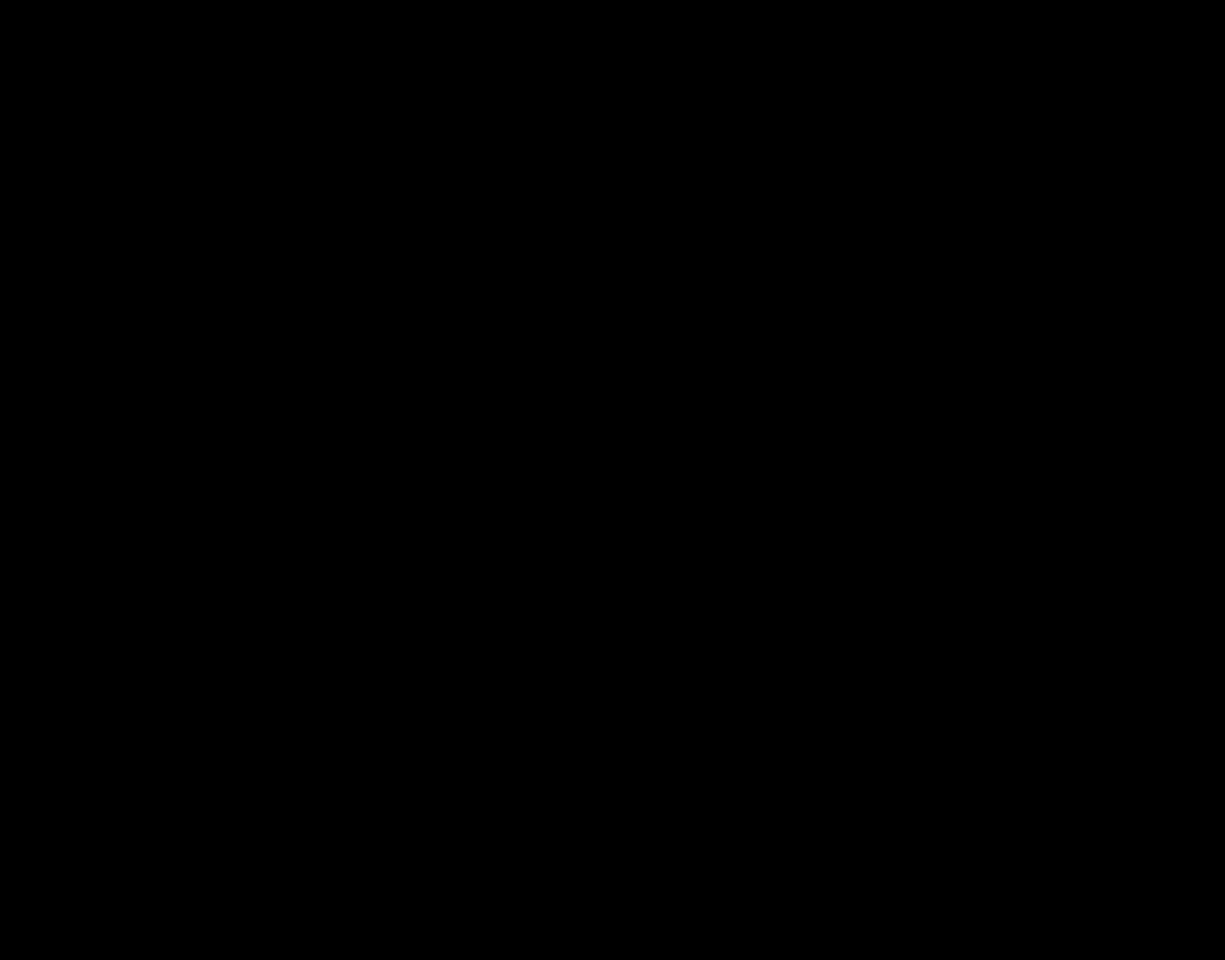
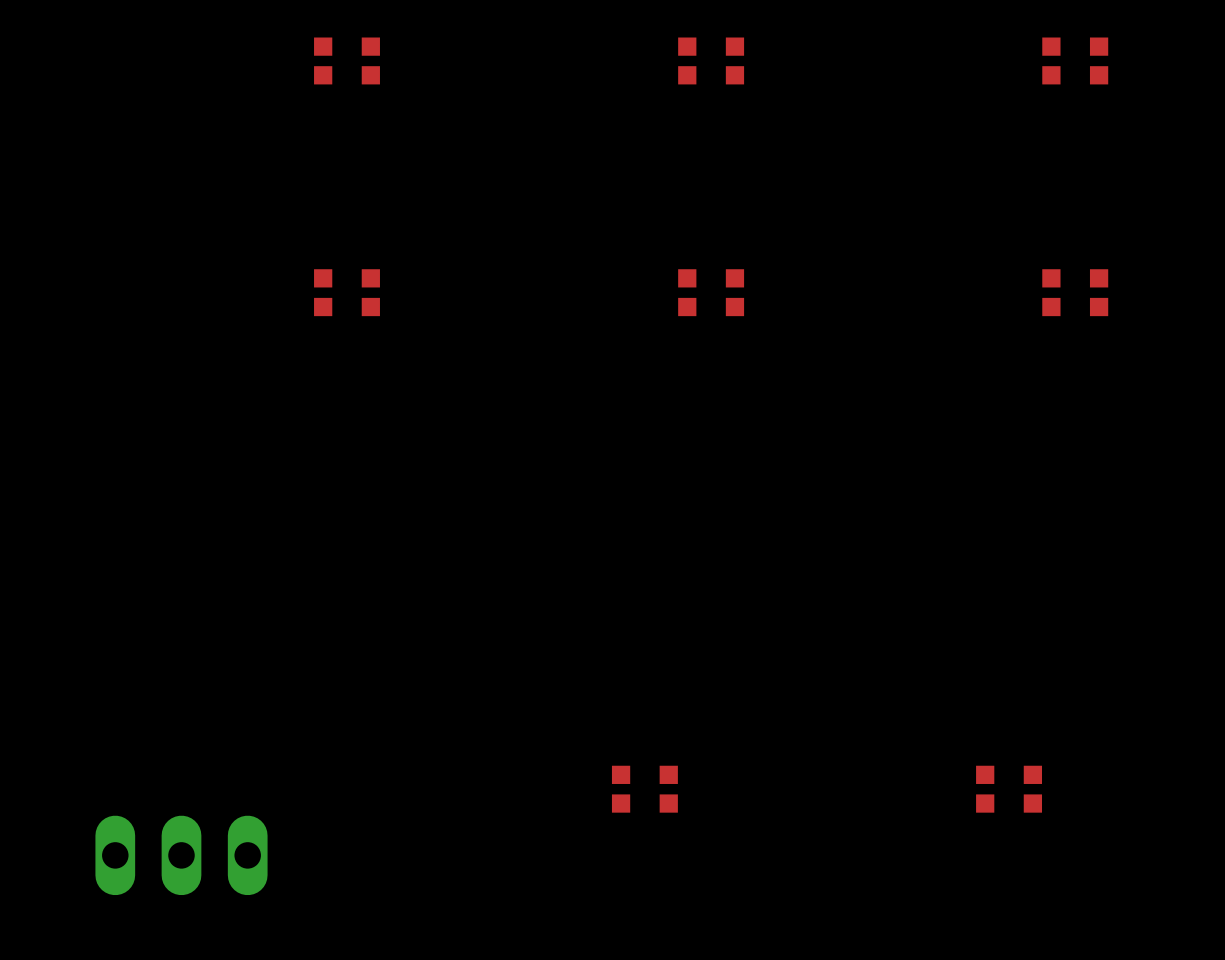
part: none -> (347, 60)
part: none -> (711, 60)
part: none -> (1075, 60)
part: none -> (347, 292)
part: none -> (711, 292)
part: none -> (1075, 292)
part: none -> (644, 789)
part: none -> (1009, 789)
part: none -> (181, 855)

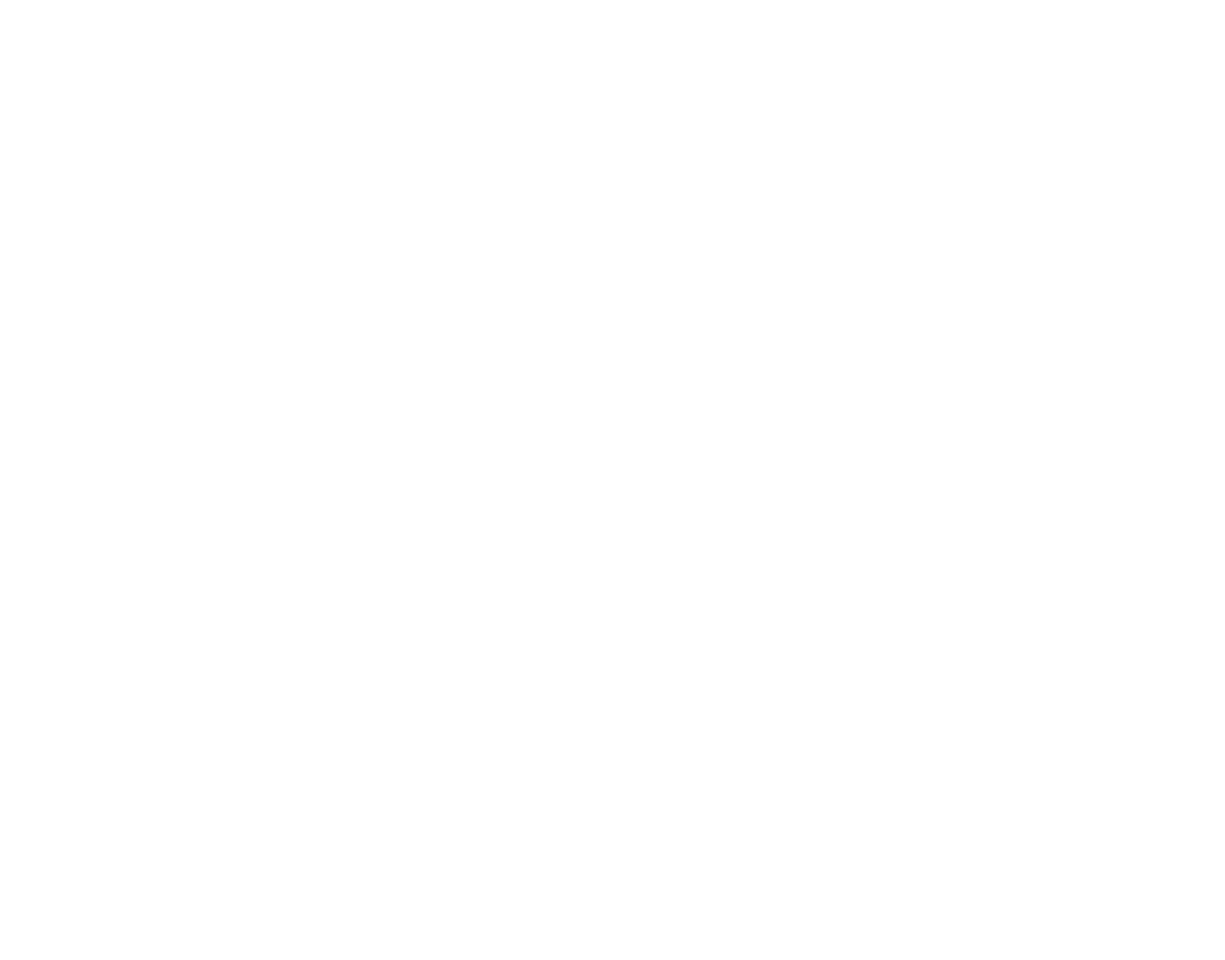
part: (347, 60) -> none
part: (711, 60) -> none
part: (1075, 60) -> none
part: (347, 292) -> none
part: (711, 292) -> none
part: (1075, 292) -> none
part: (644, 789) -> none
part: (1009, 789) -> none
part: (181, 855) -> none

